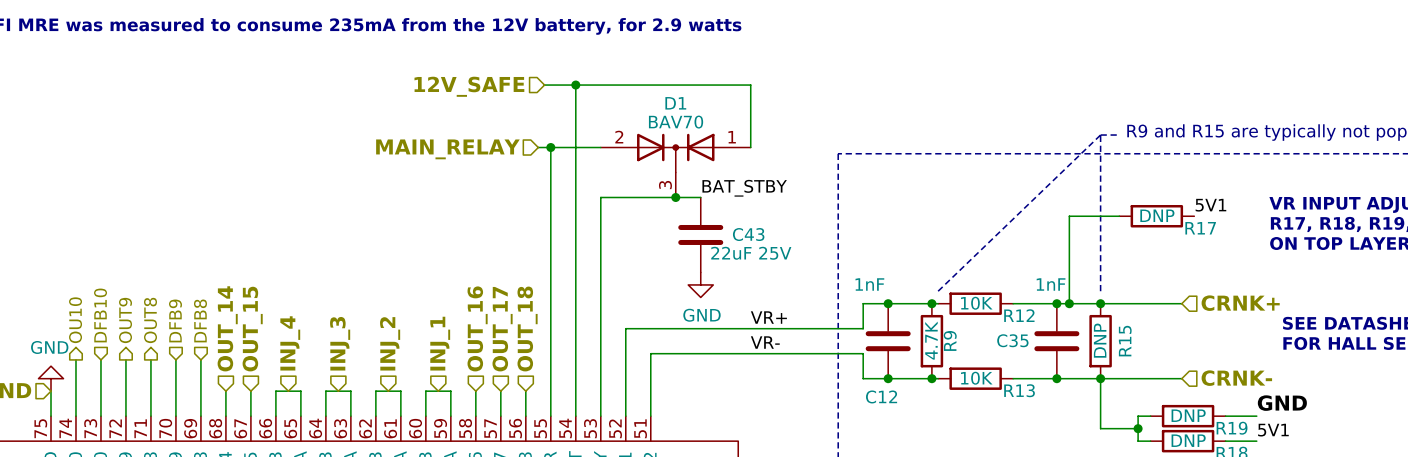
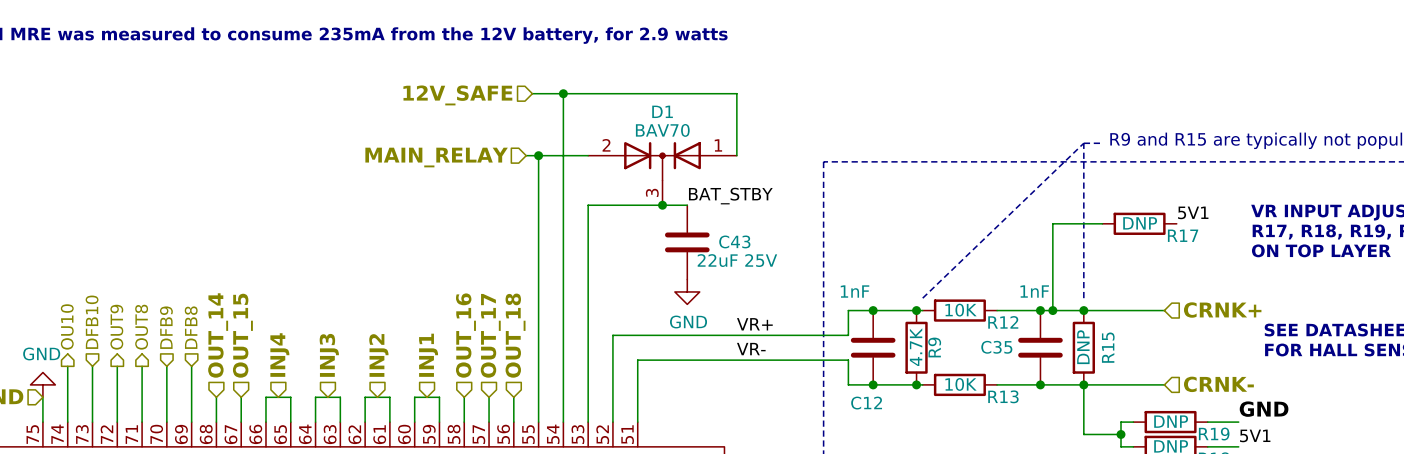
hierarchical label: INJ_4 (290, 343) -> INJ4 (279, 355)
hierarchical label: INJ_3 (340, 343) -> INJ3 (329, 355)
hierarchical label: INJ_2 (390, 343) -> INJ2 (378, 355)
hierarchical label: INJ_1 (440, 343) -> INJ1 (428, 355)

